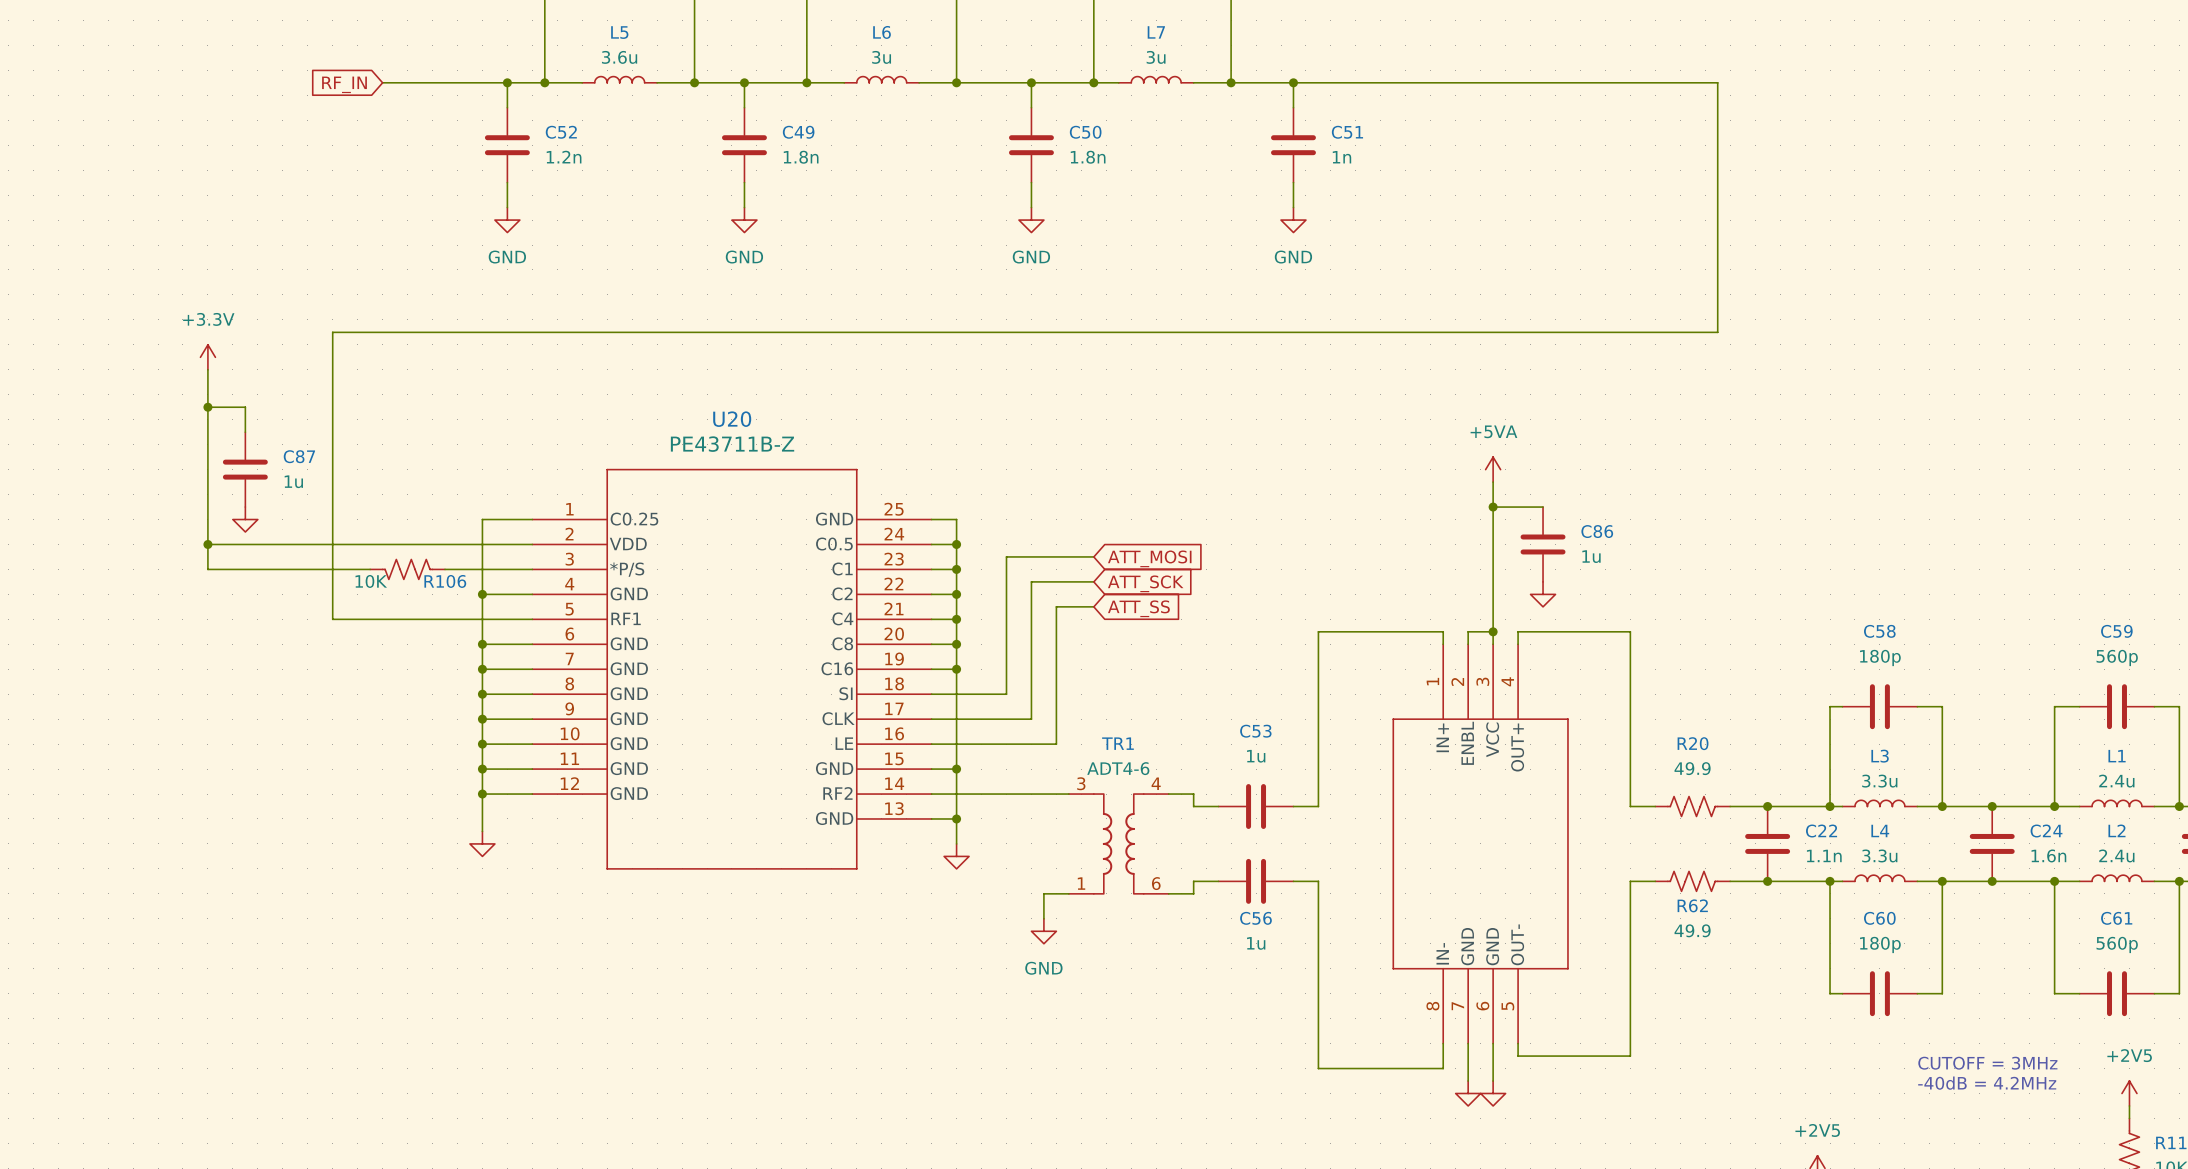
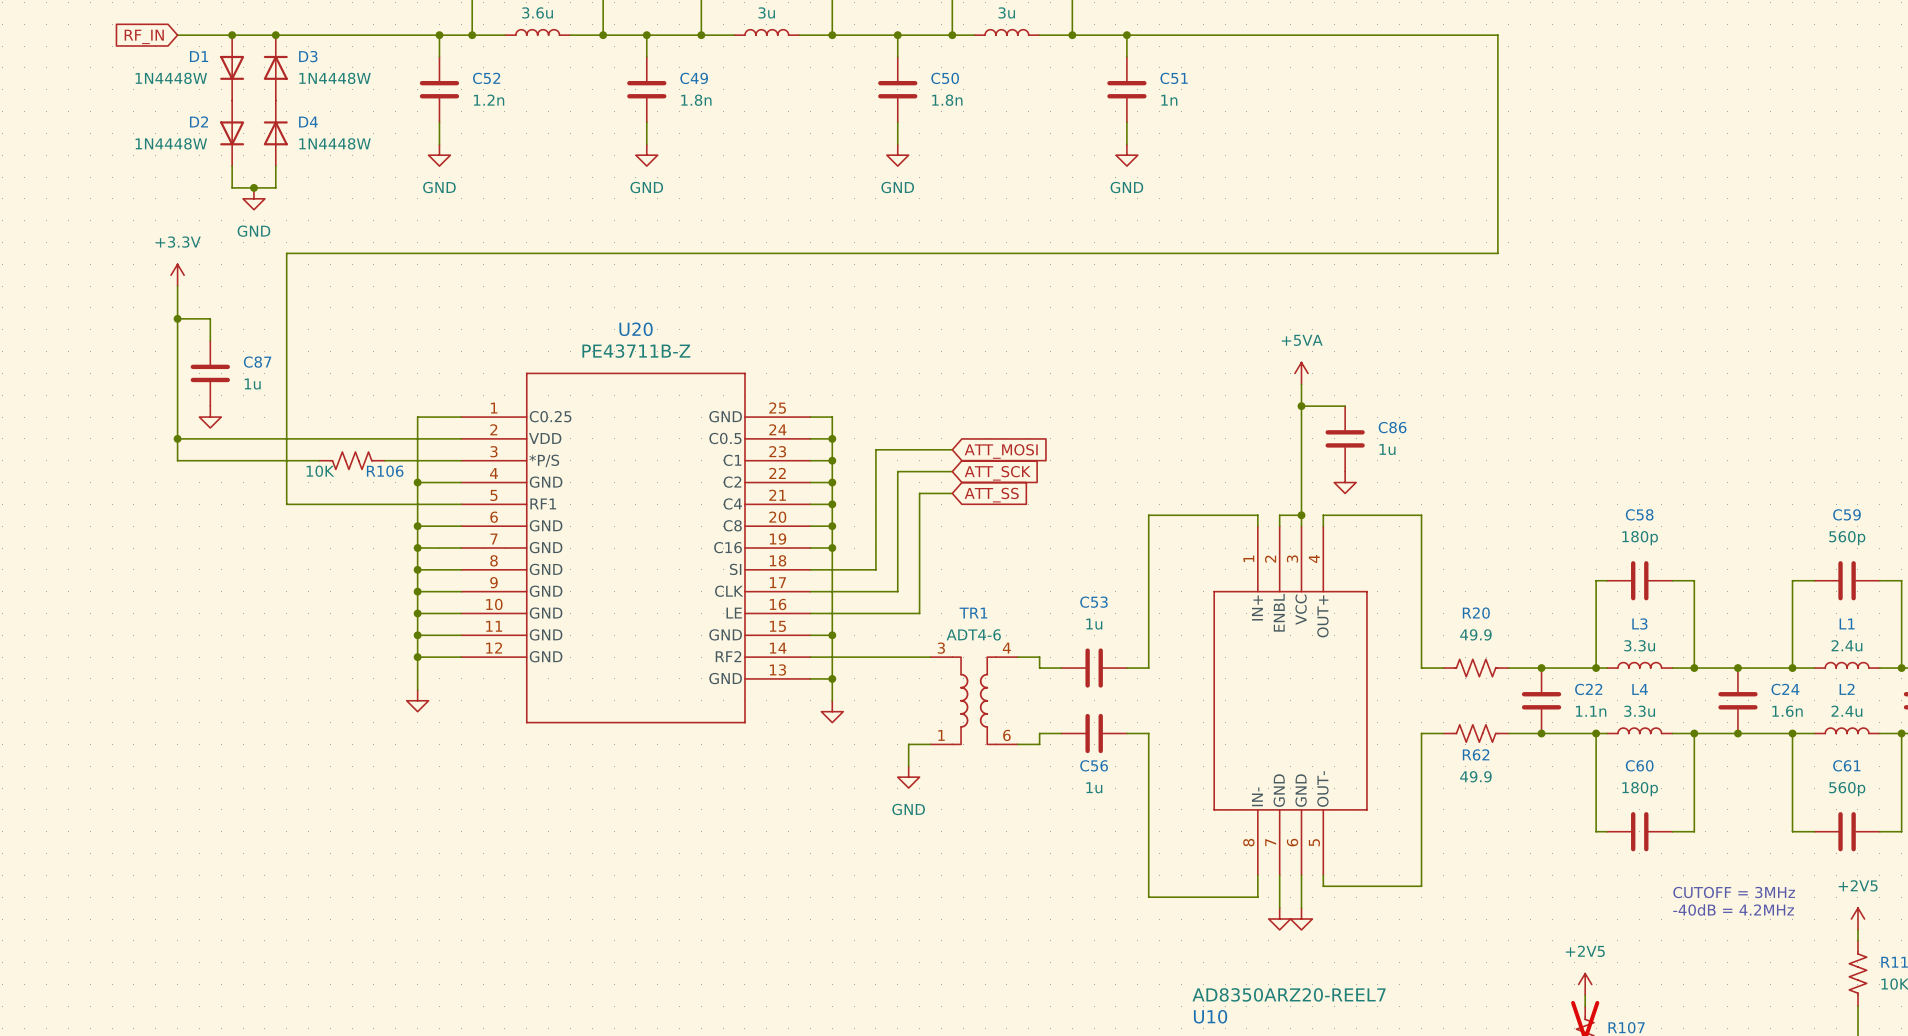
wire: none -> (177, 35) (330, 35)
junction: none -> (232, 35)
junction: none -> (275, 35)
global label position: RF_IN (344, 84) -> RF_IN (144, 36)
D1: none -> 1N4448W (232, 67)
D3: none -> 1N4448W (275, 67)
D2: none -> 1N4448W (232, 133)
D4: none -> 1N4448W (275, 133)
wire: none -> (232, 166) (232, 187) (275, 187) (275, 166)
junction: none -> (253, 187)
power symbol: none -> GND (253, 198)

